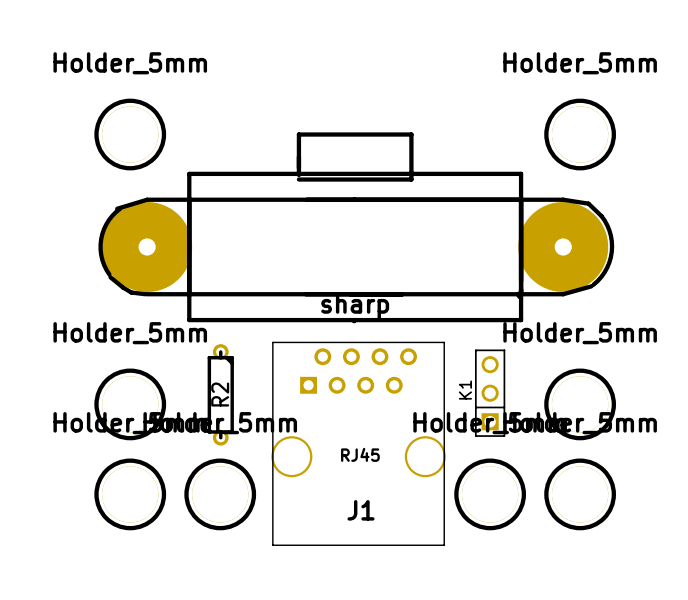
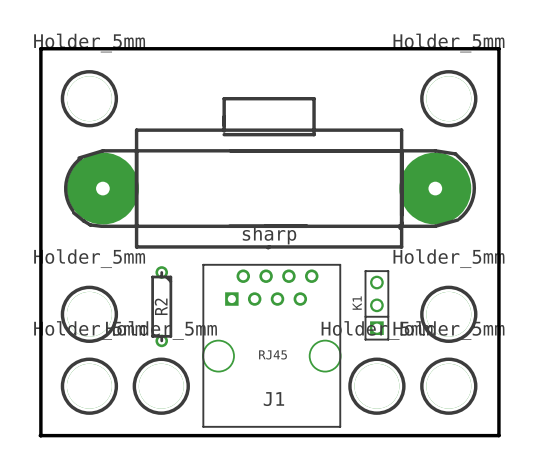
board edge: none -> (40, 435) (498, 435) (498, 48) (40, 48) (40, 435)

